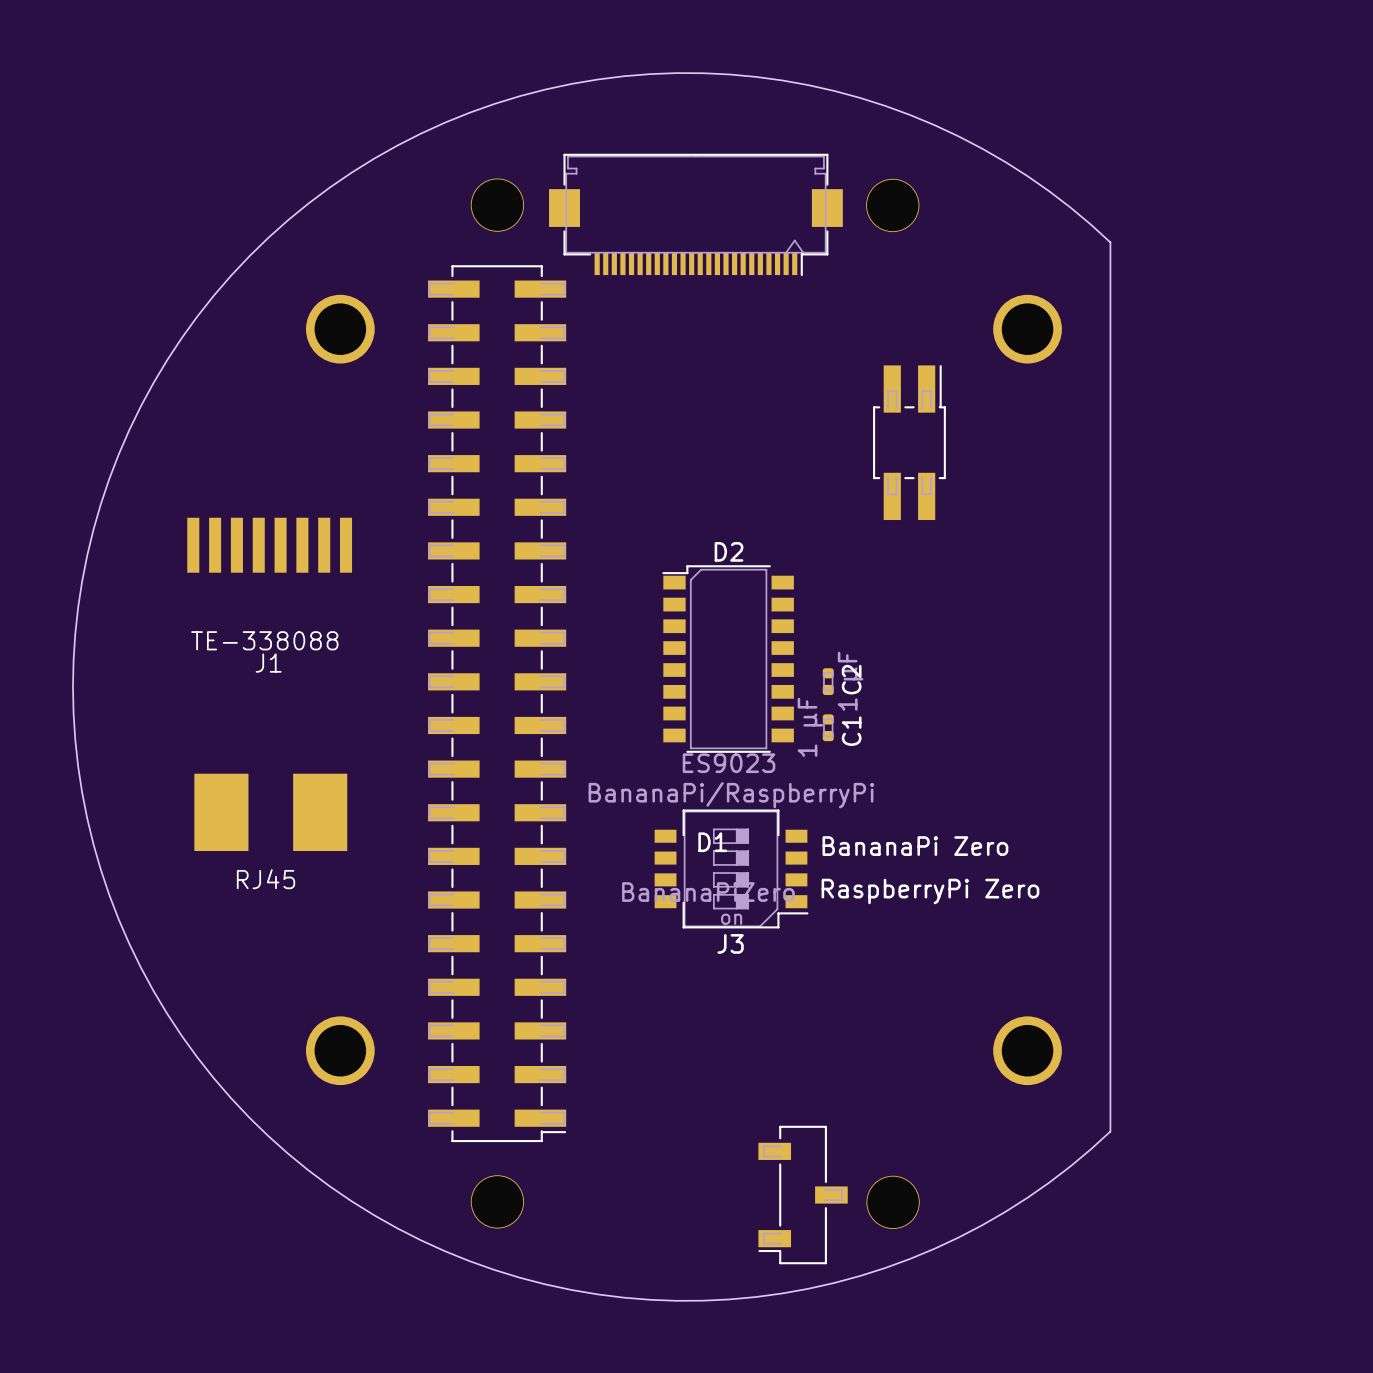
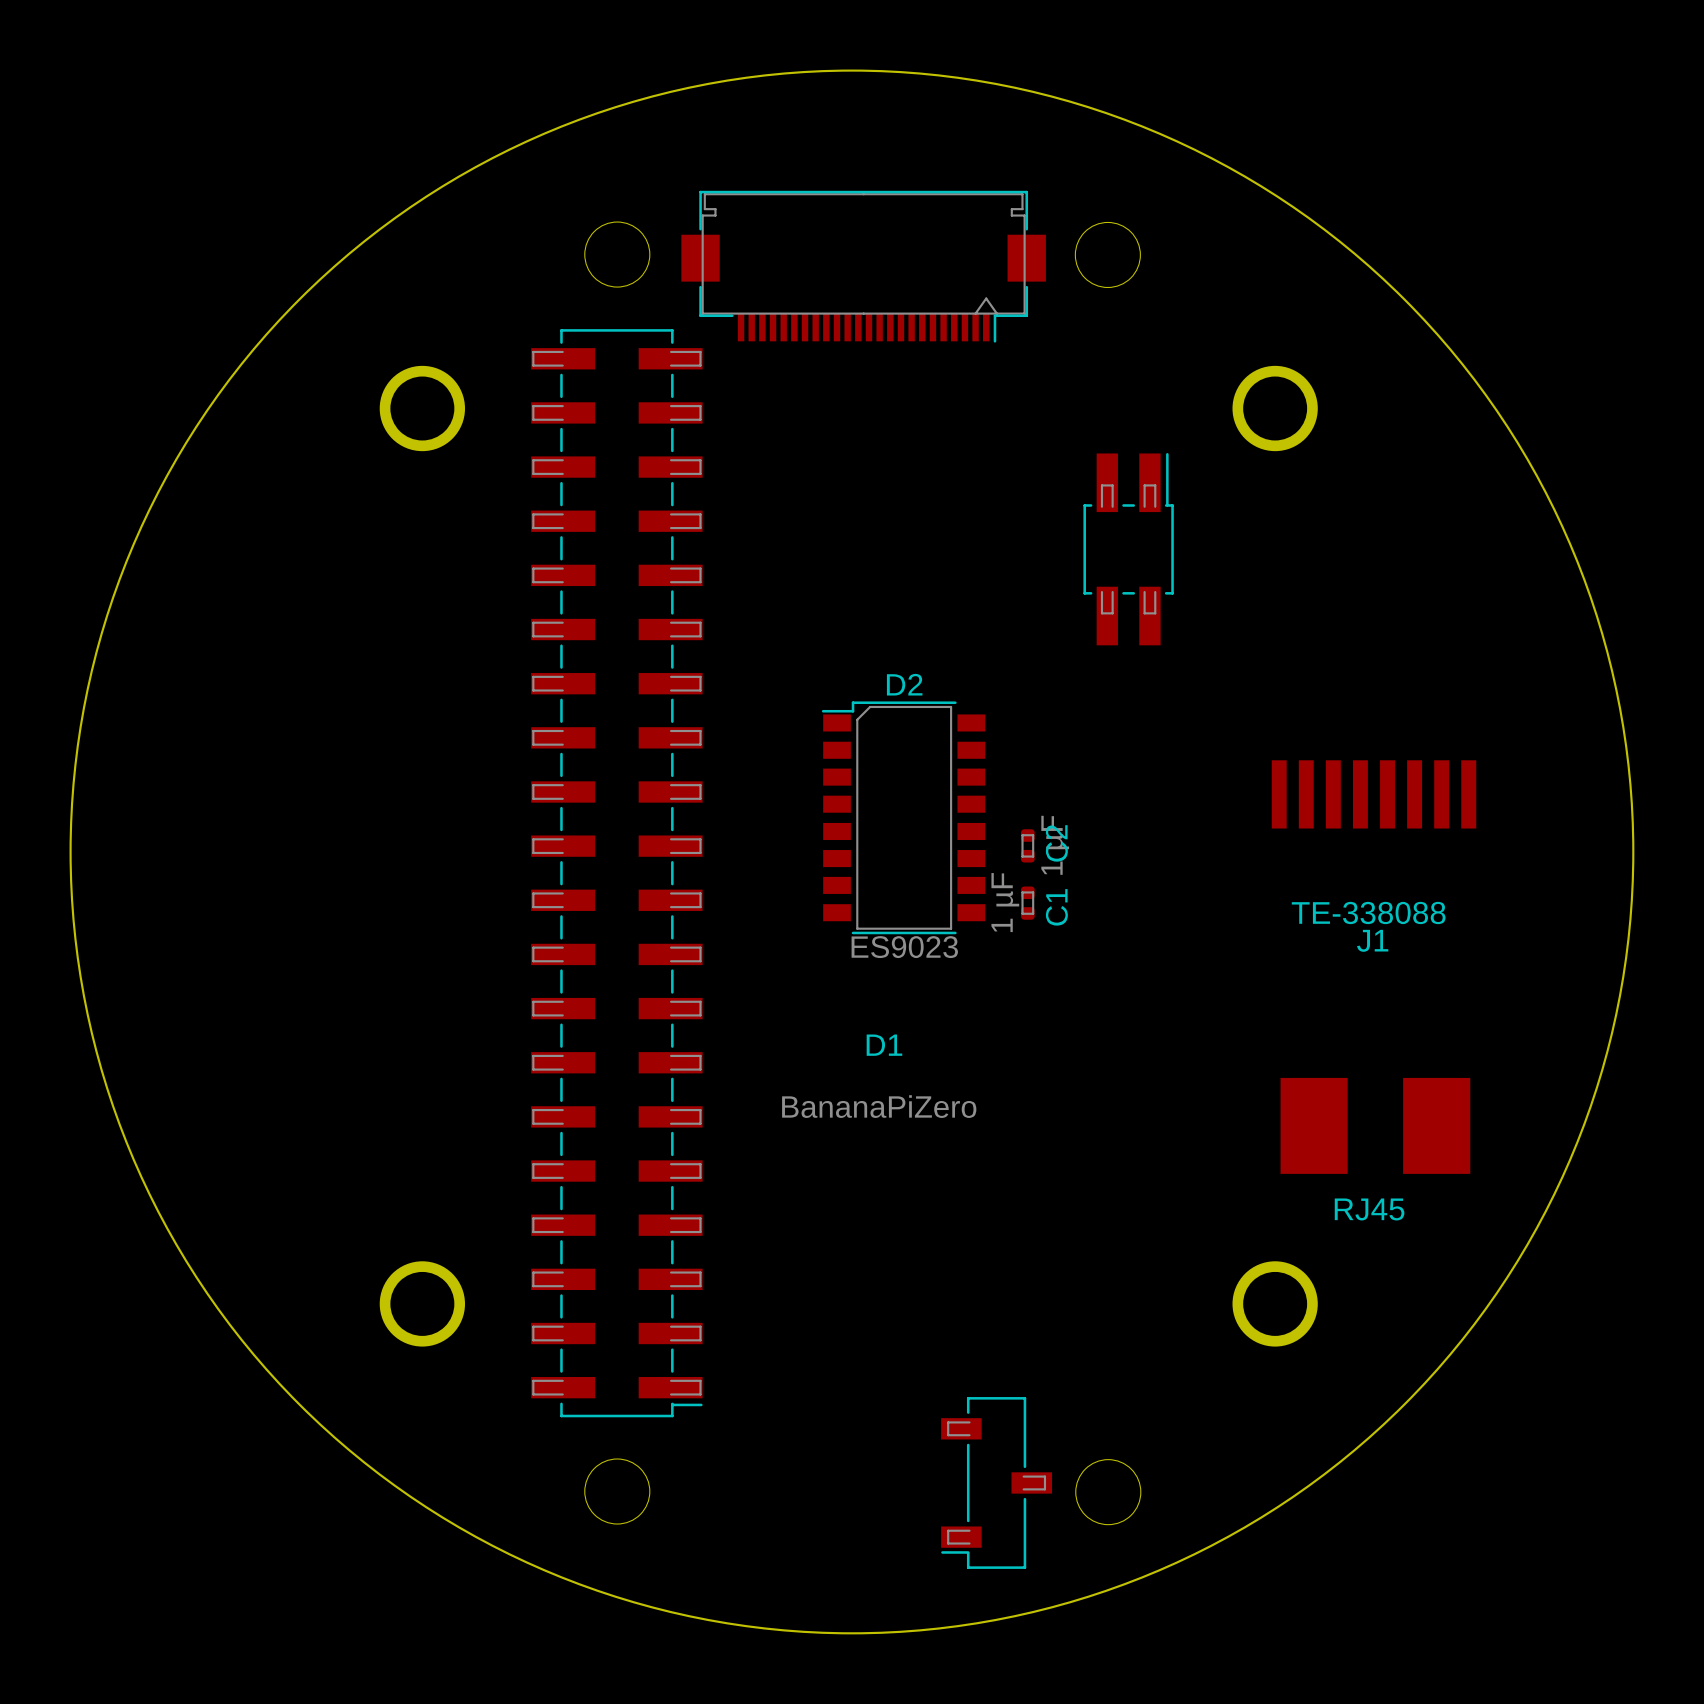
round board edge: none -> [69, 69, 1635, 1635]
J1 position: (269, 684) -> (1373, 967)
text: BananaPi Zero (915, 846) -> none
J3: BananaPi/RaspberryPi (731, 868) -> none
text: RaspberryPi Zero (930, 891) -> none
board edge: (1110, 1131) (1049, 1182) (1005, 1212) (958, 1237) (910, 1258) (859, 1276) (782, 1293) (703, 1300) (650, 1299) (597, 1294) (545, 1284) (494, 1269) (420, 1240) (374, 1215) (329, 1186) (287, 1153) (231, 1098) (181, 1035) (153, 990) (129, 943) (109, 894) (93, 844) (78, 766) (73, 713) (73, 660) (78, 607) (87, 555) (100, 504) (129, 429) (167, 360) (197, 316) (231, 275) (268, 237) (308, 203) (351, 172) (397, 145) (445, 122) (494, 103) (545, 89) (624, 76) (677, 73) (730, 74) (808, 85) (860, 97) (910, 115) (958, 136) (1027, 176) (1070, 207) (1110, 242) (1110, 1131) -> none

